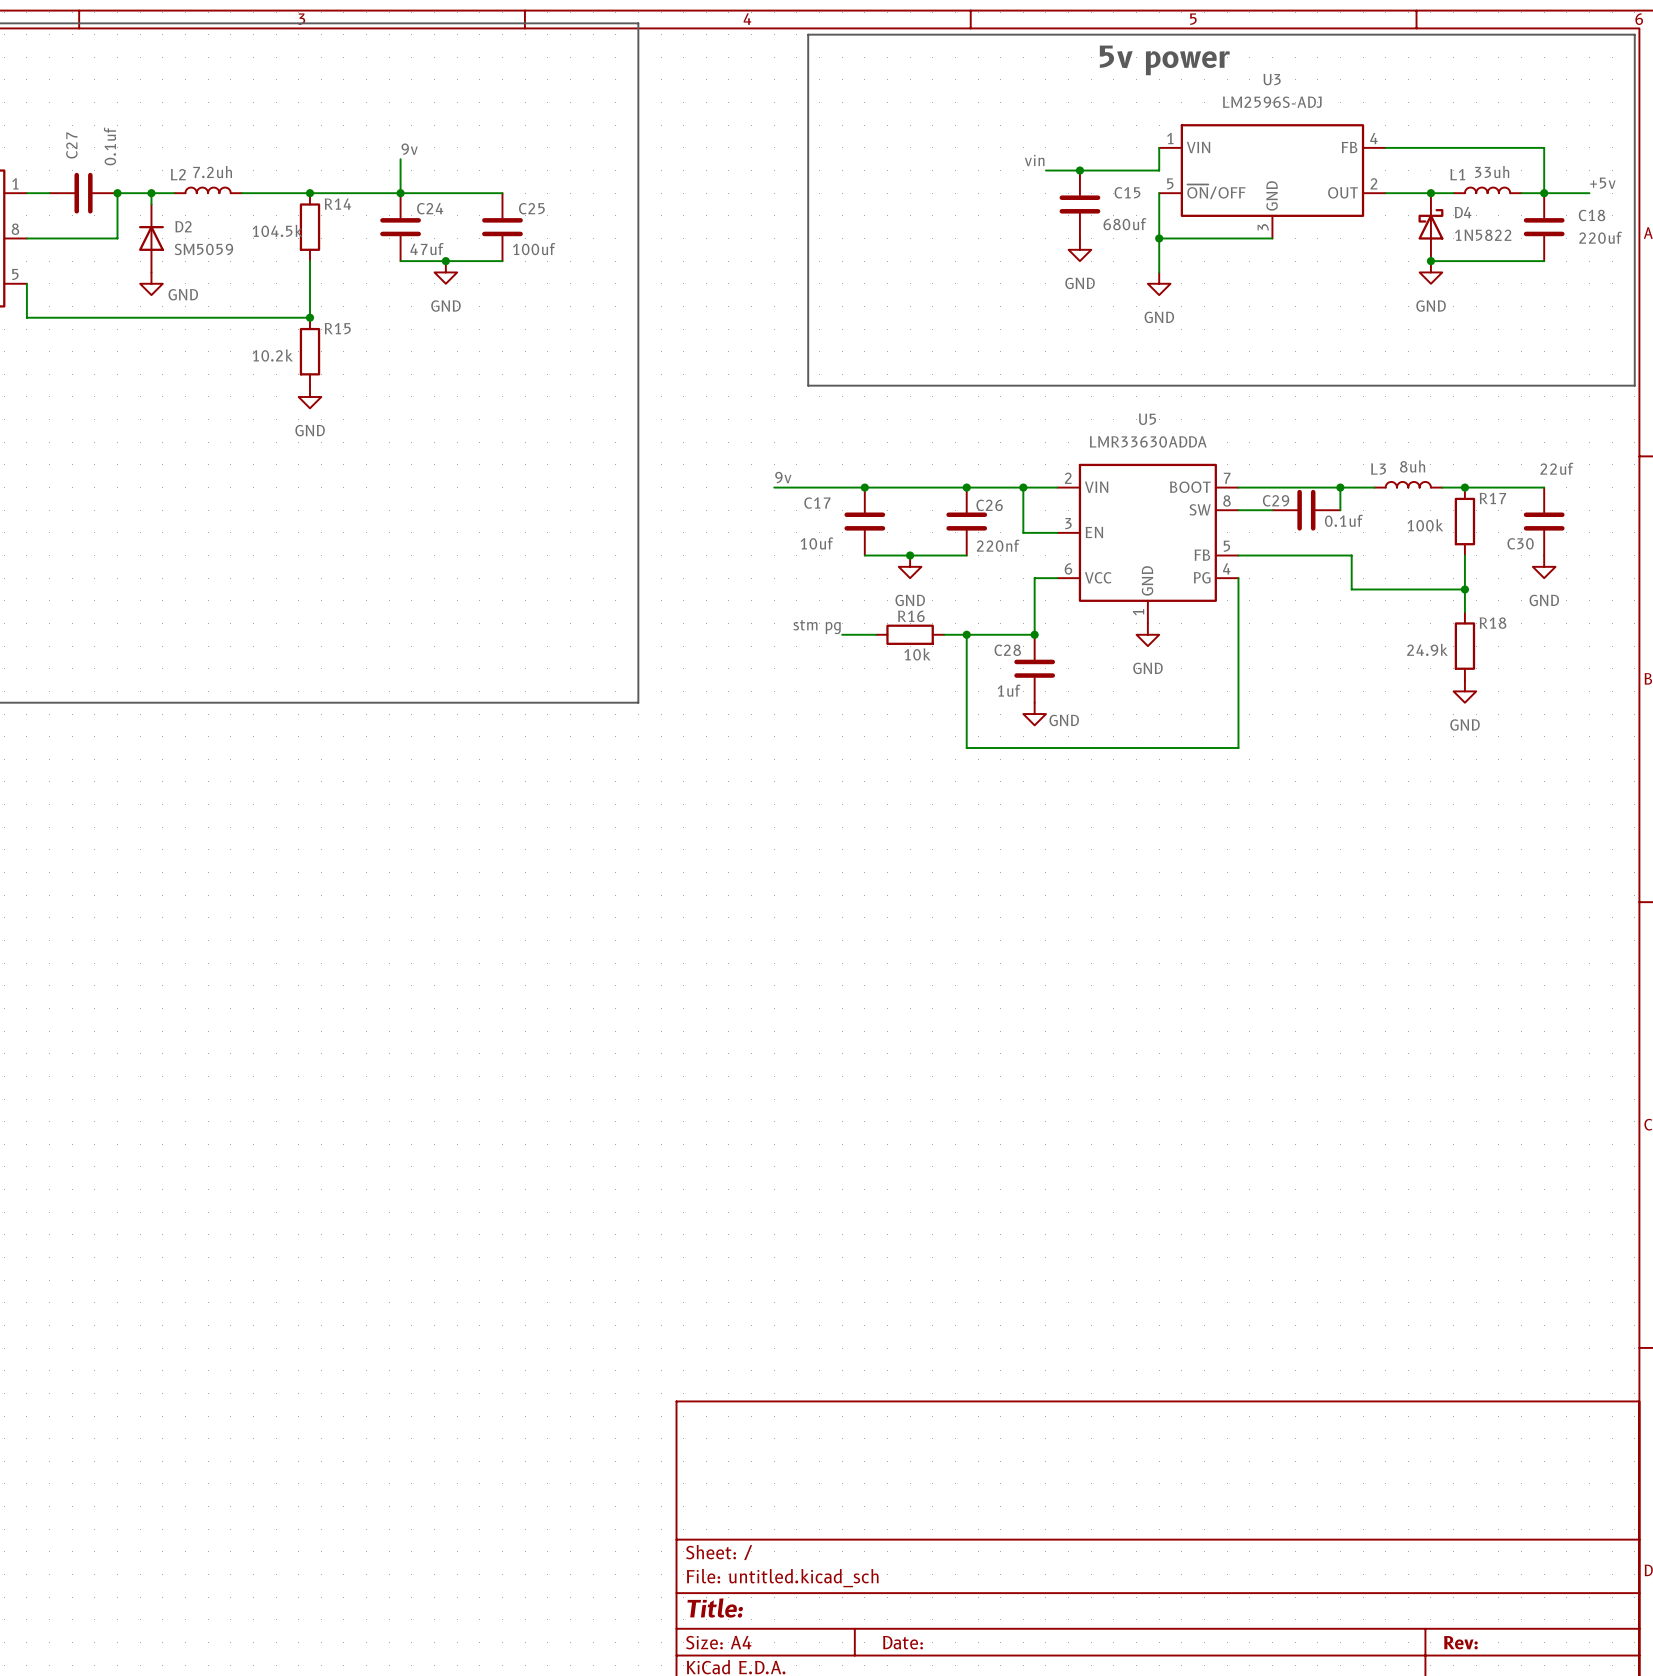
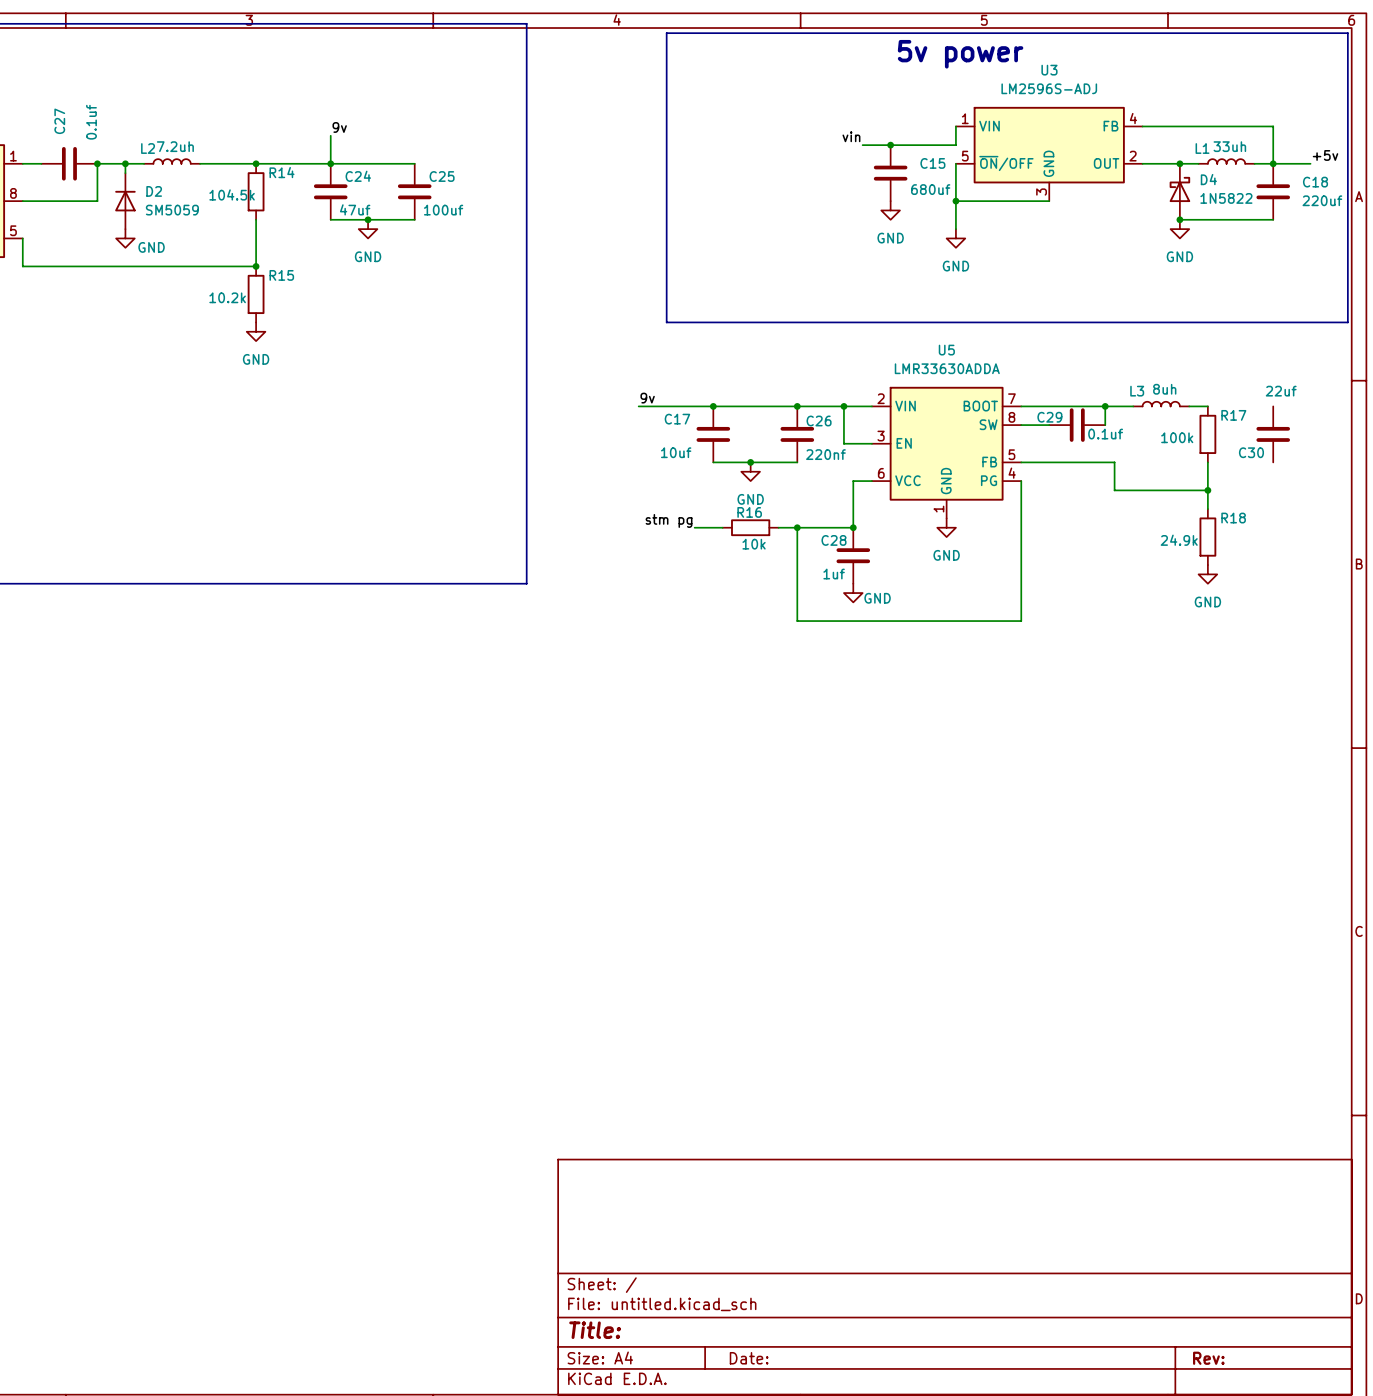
wire: (1464, 487) (1544, 487) -> none
junction: (1464, 487) -> none
power symbol: GND (1544, 566) -> none

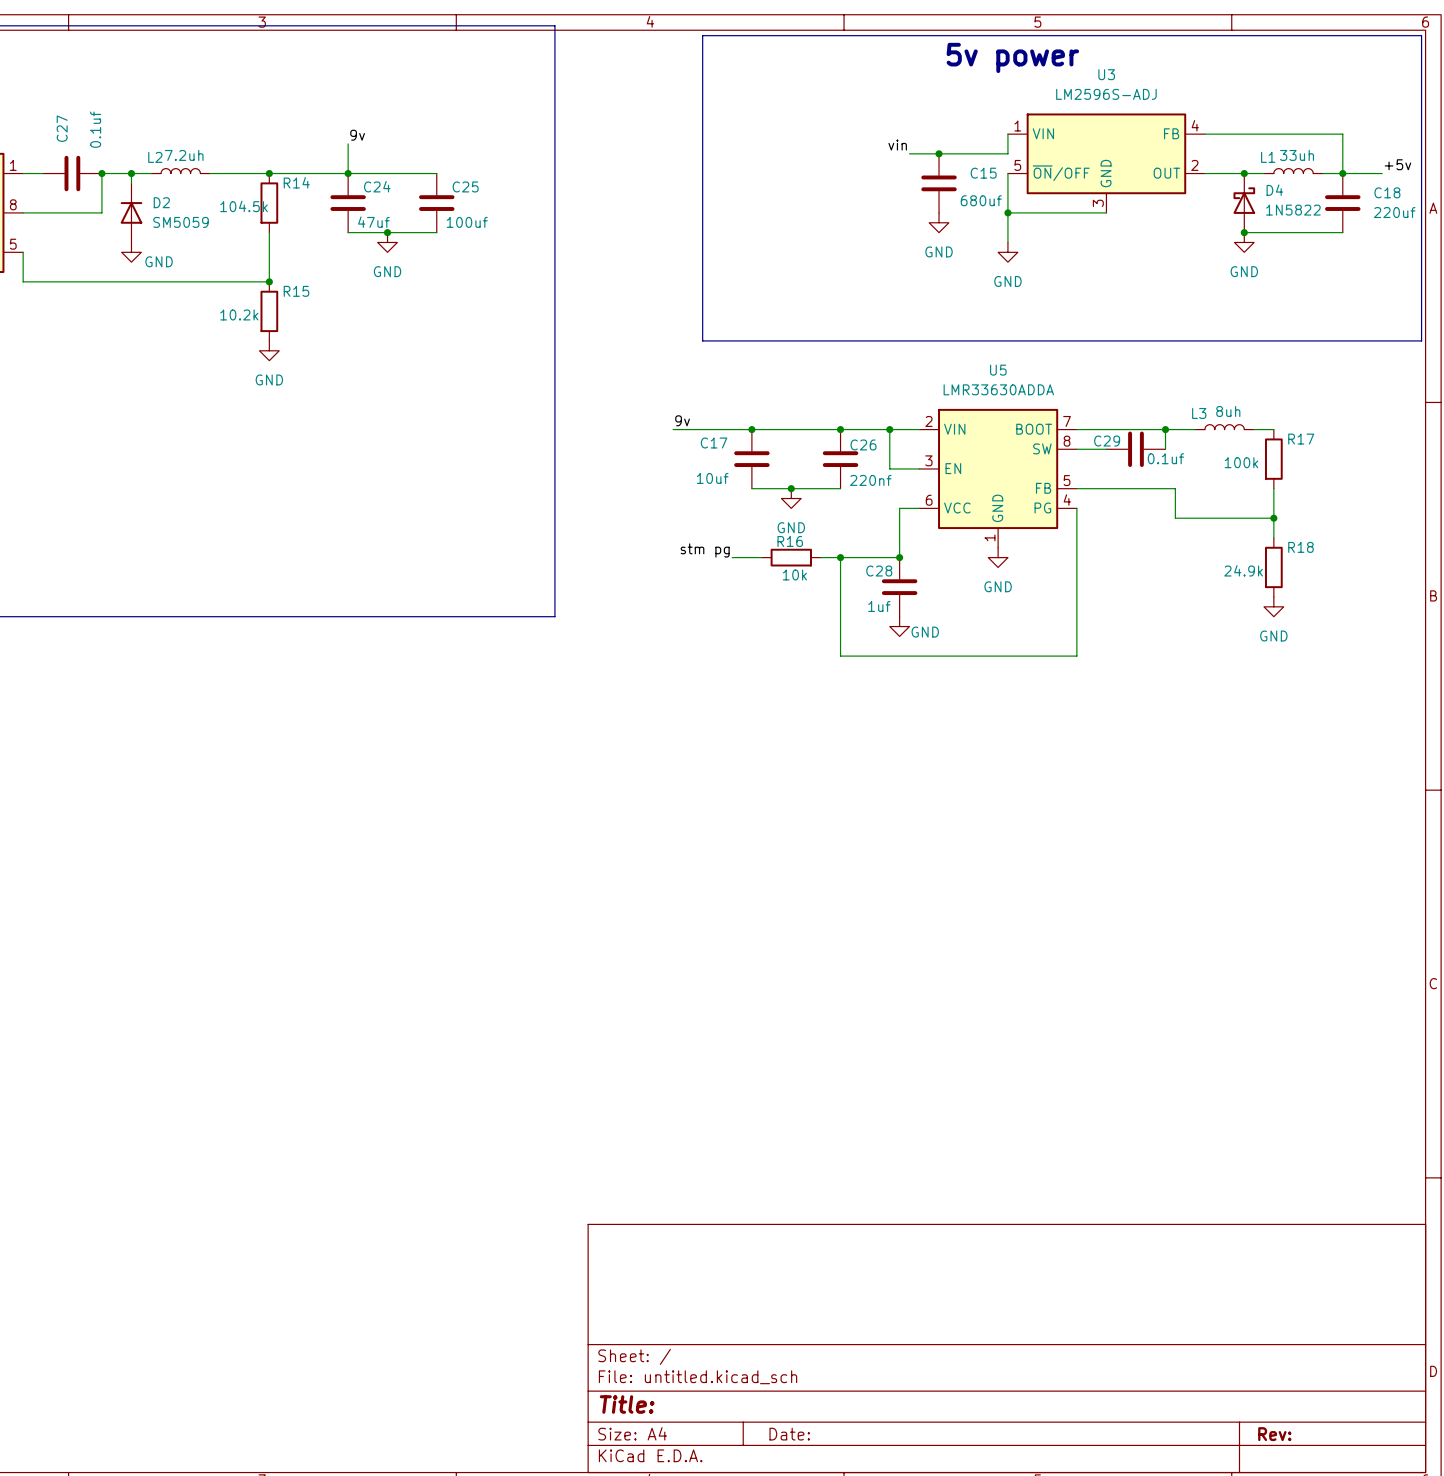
C30: 22uf (1273, 434) -> none

